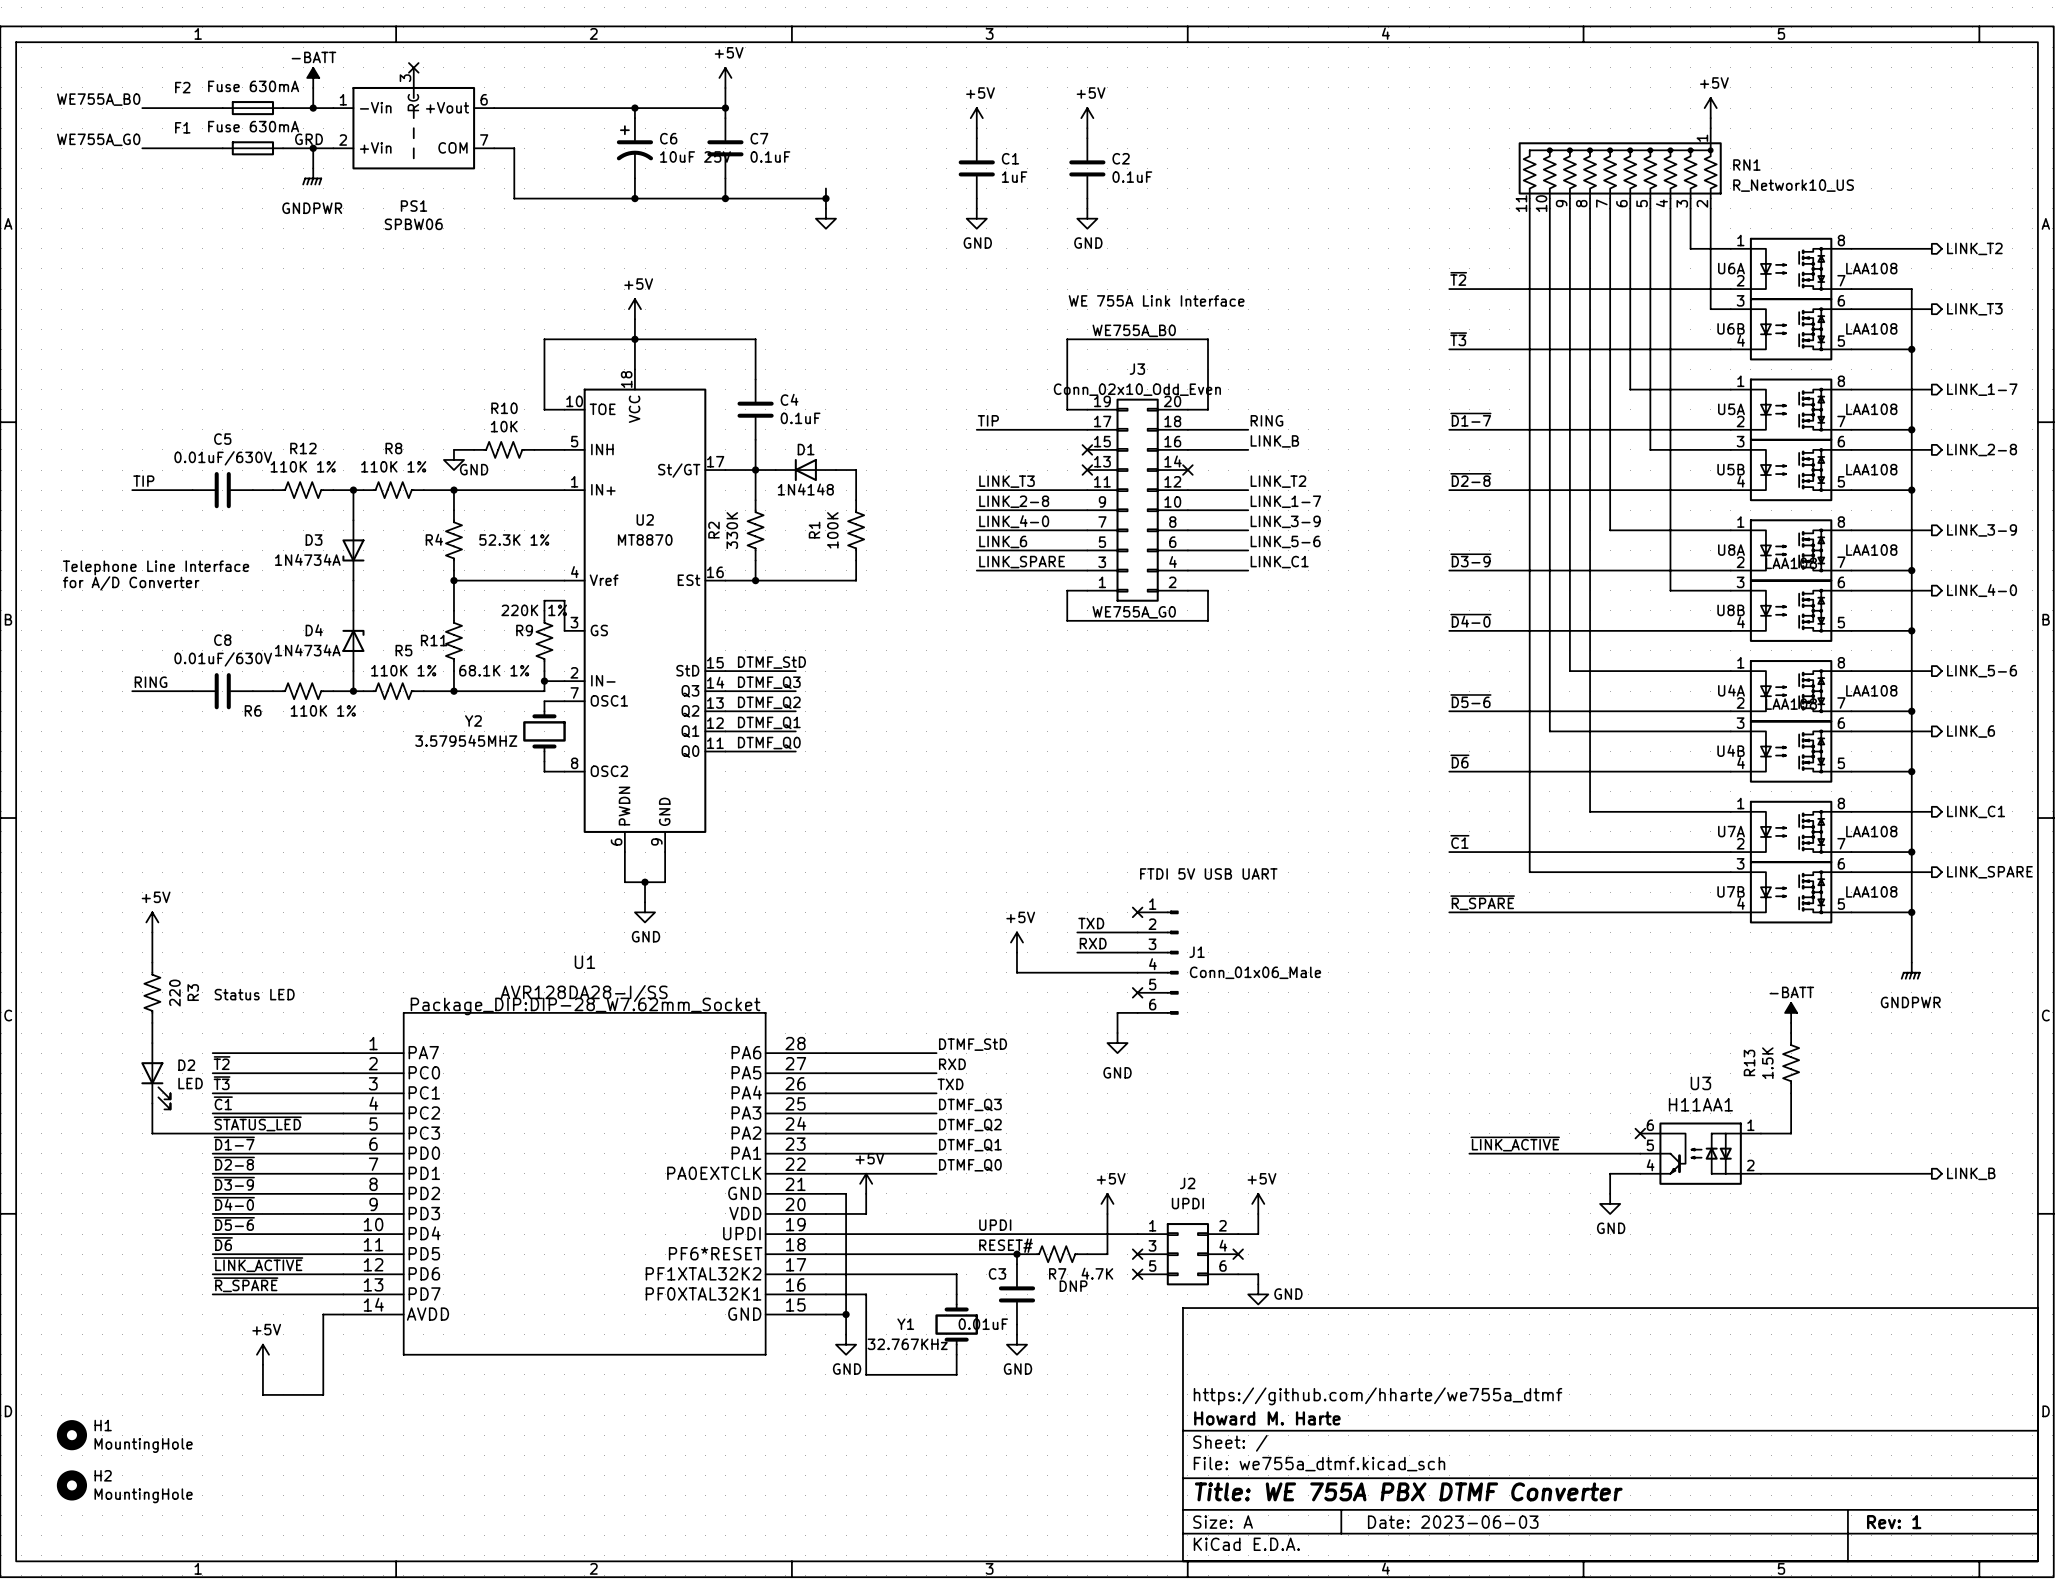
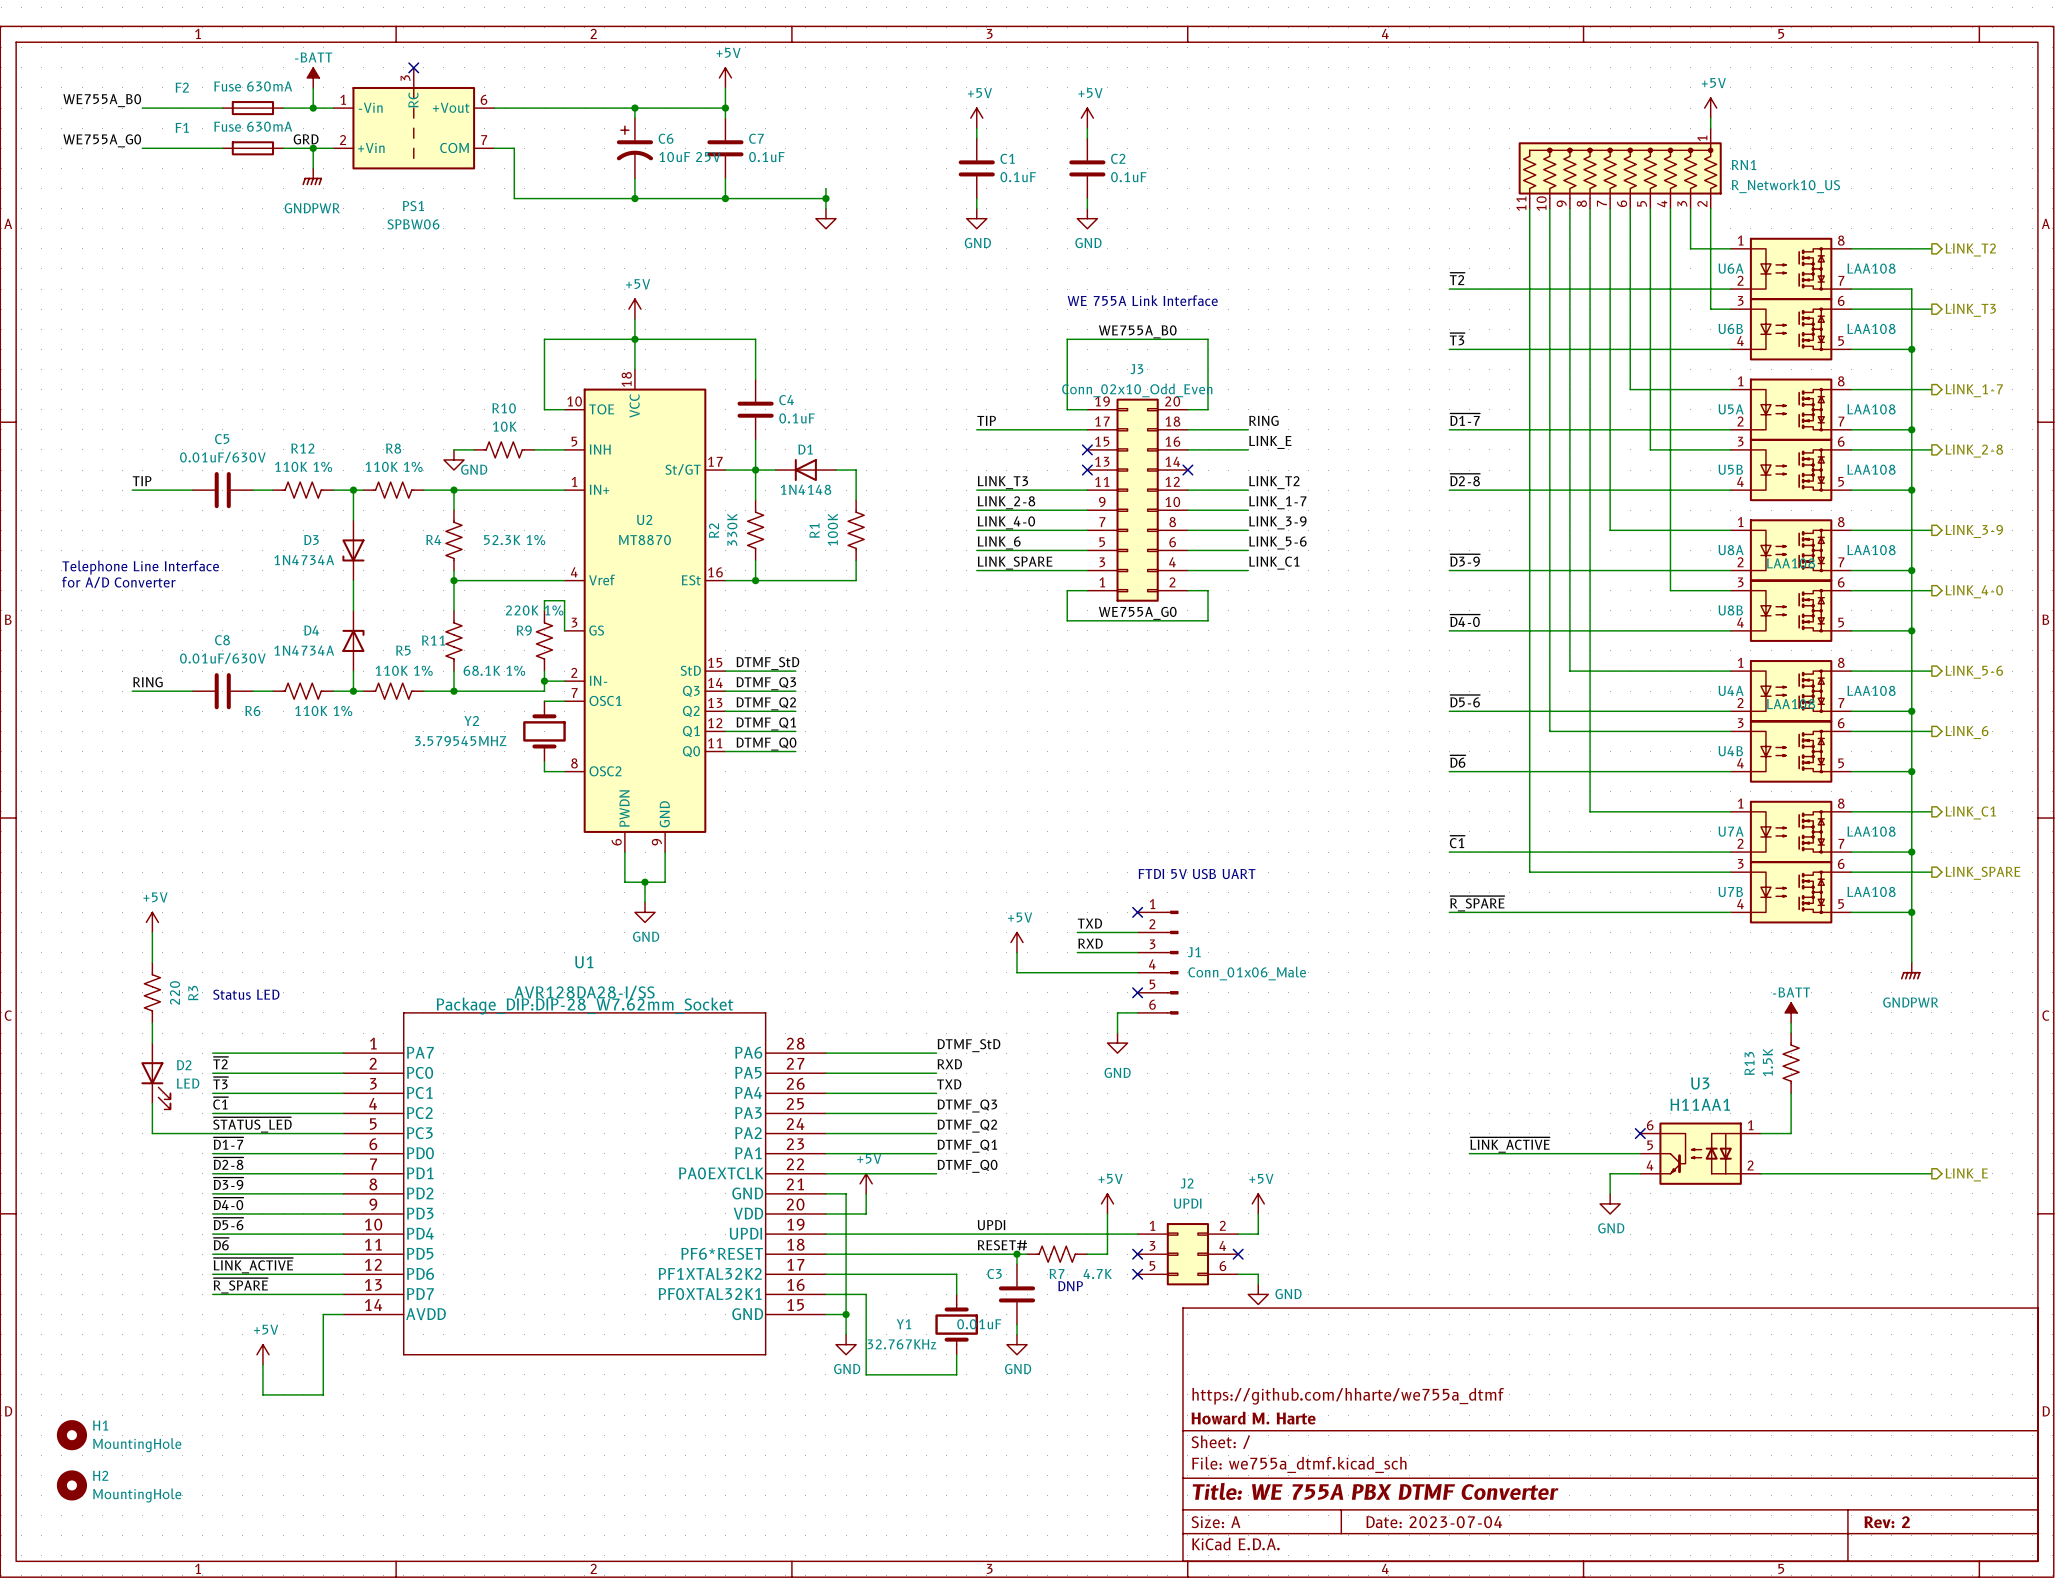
C1 value: 1uF (1014, 177) -> 0.1uF (1018, 177)
label: LINK_B (1274, 441) -> LINK_E (1270, 442)
hierarchical label: LINK_B (1971, 1173) -> LINK_E (1966, 1174)
title block: Date: 2023-06-03 (1453, 1522) -> Date: 2023-07-04 (1434, 1522)
title block: Rev: 1 (1894, 1522) -> Rev: 2 (1887, 1522)

